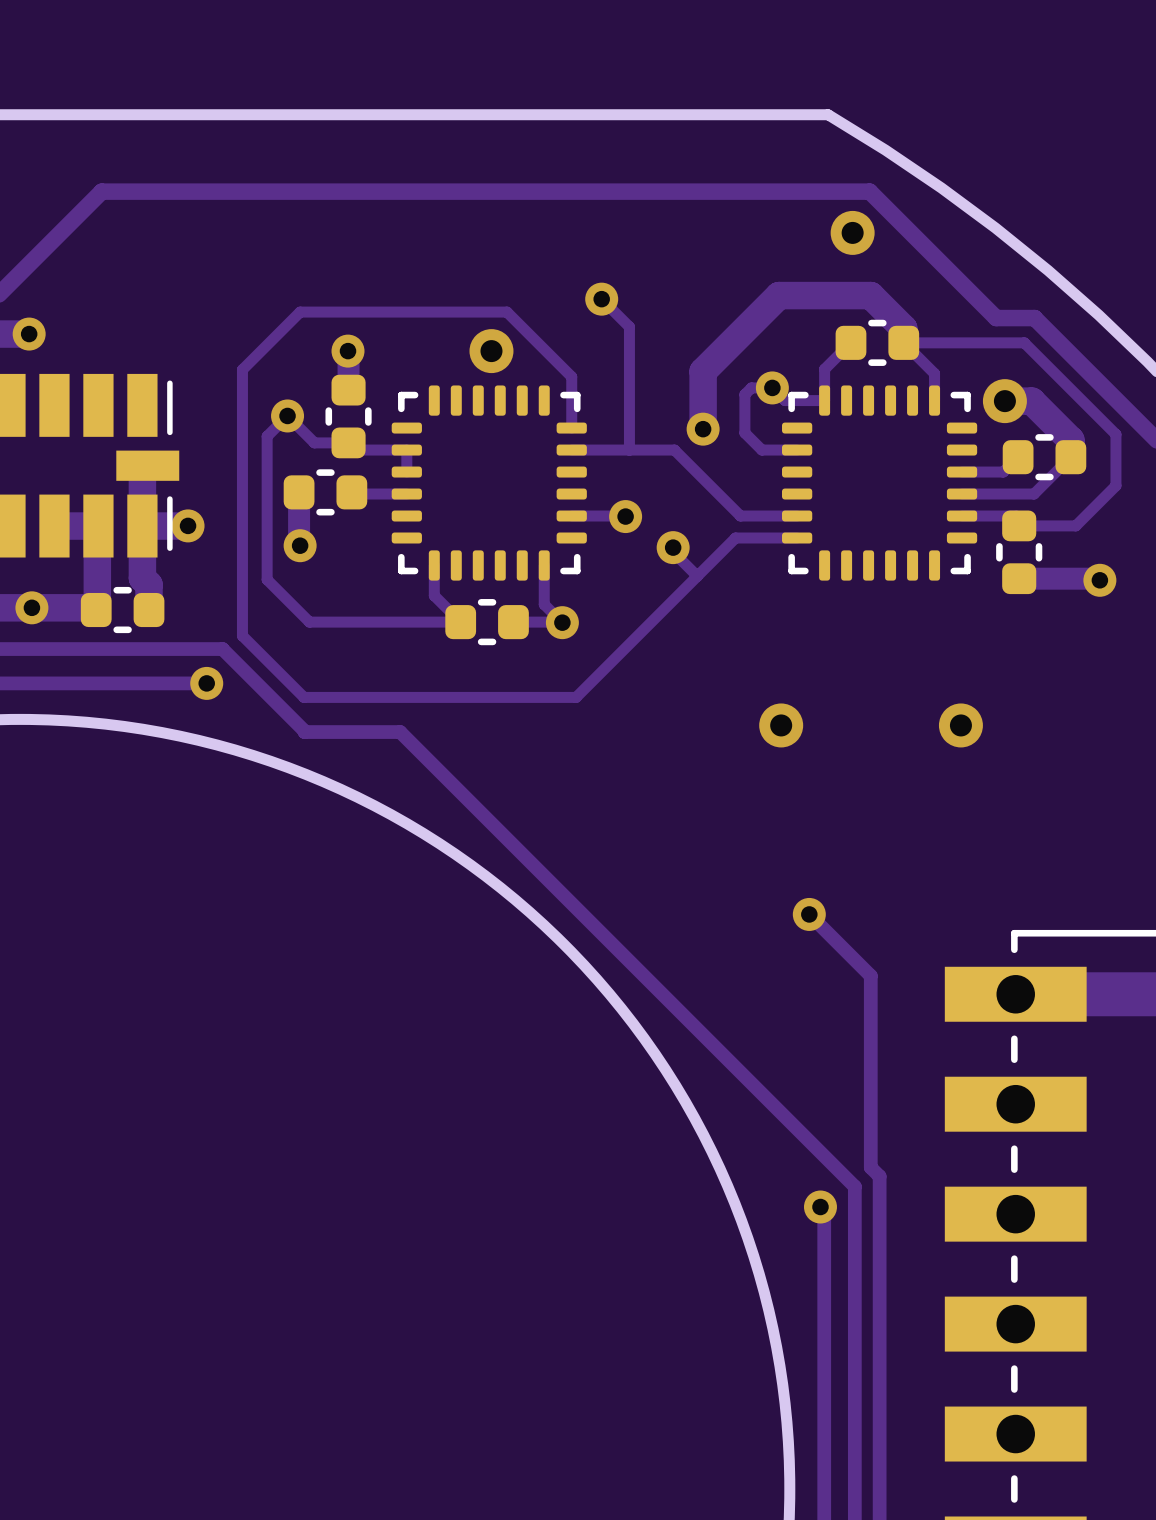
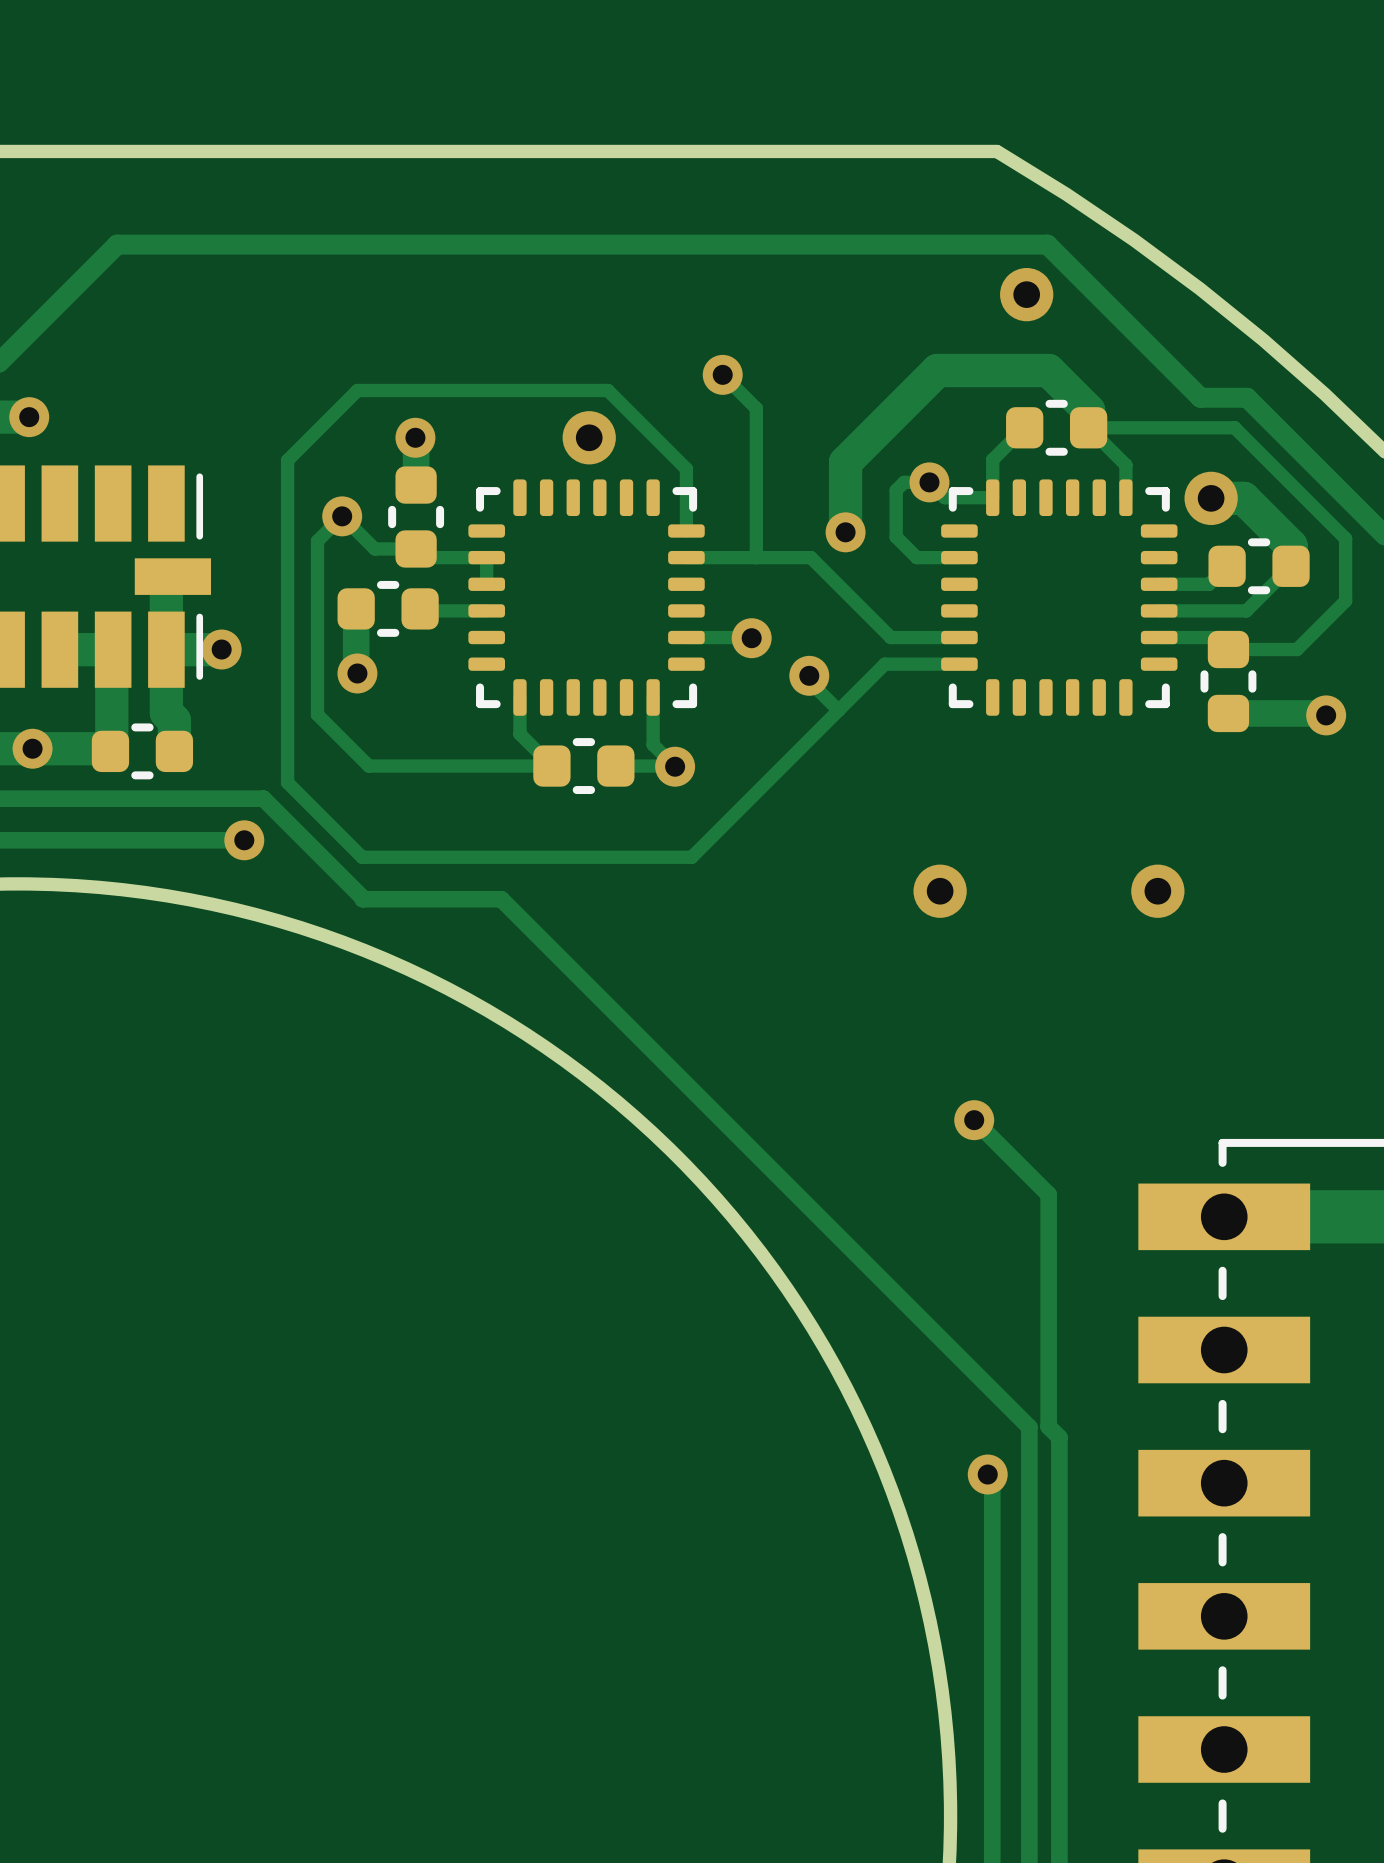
track: (400, 732) (854, 1186) -> (478, 899) (501, 899) (1029, 1427) (1029, 1449)

